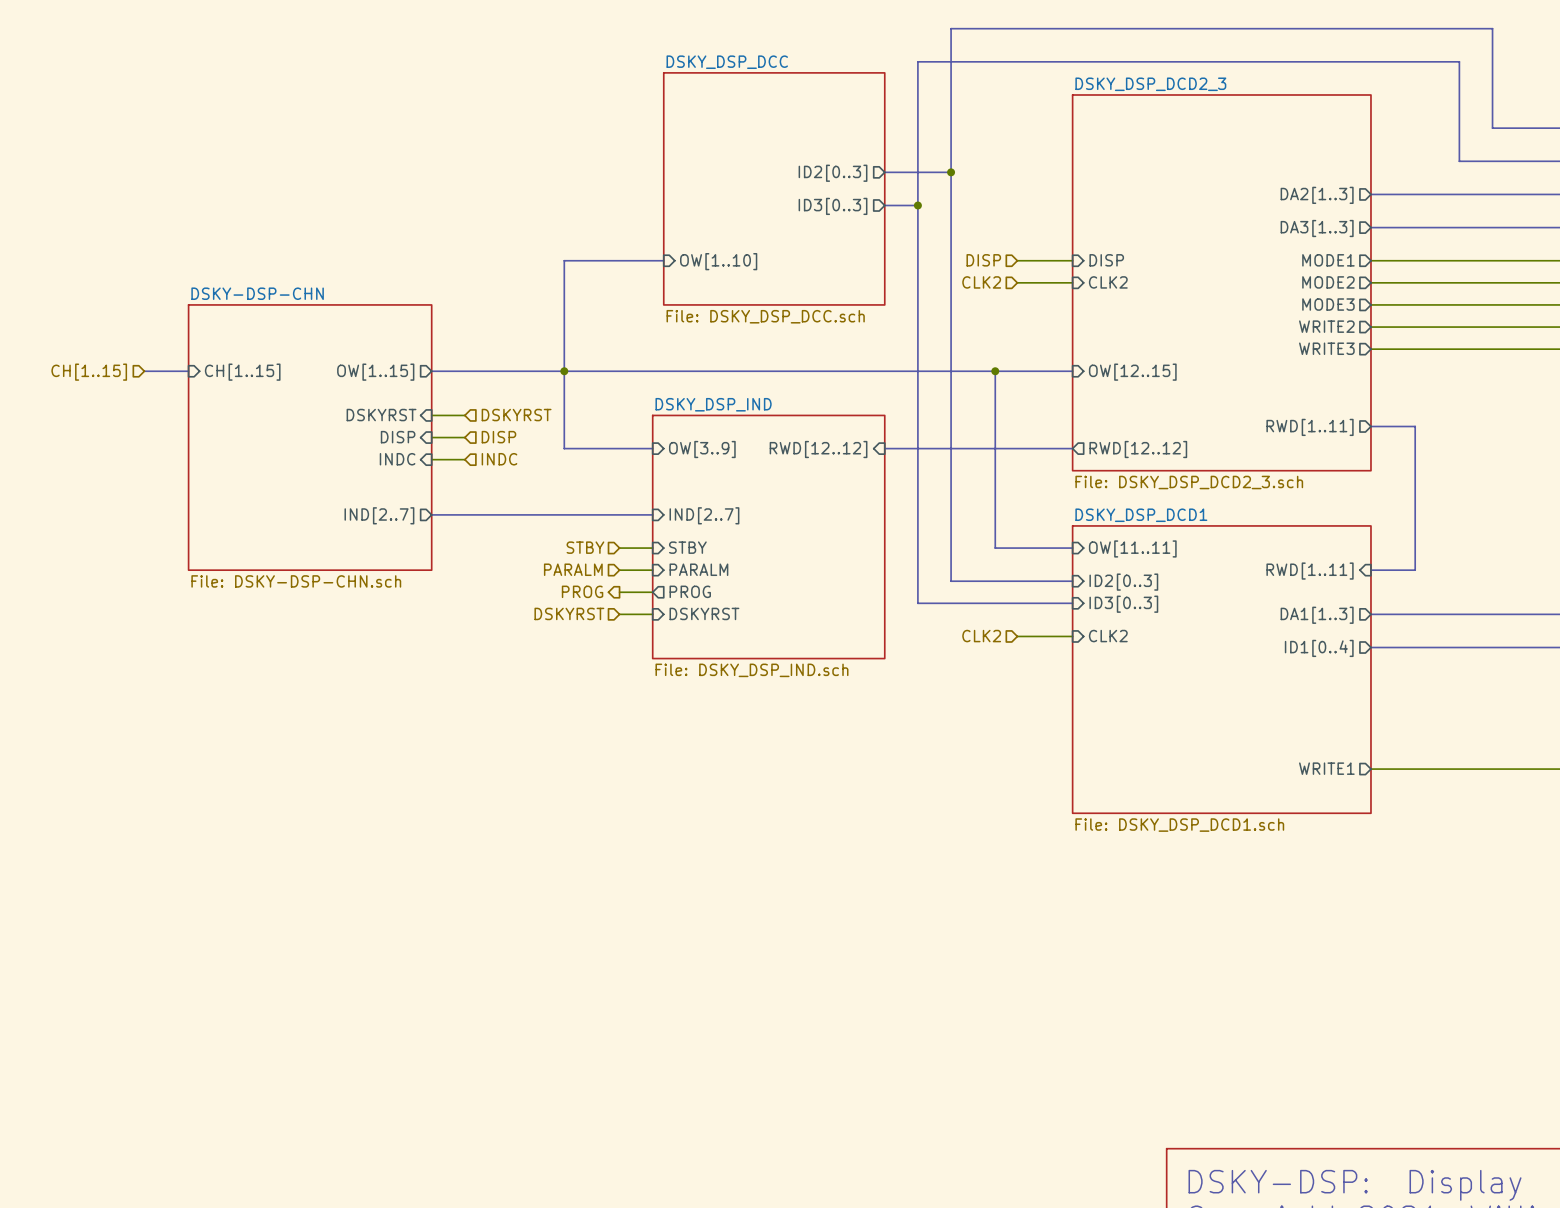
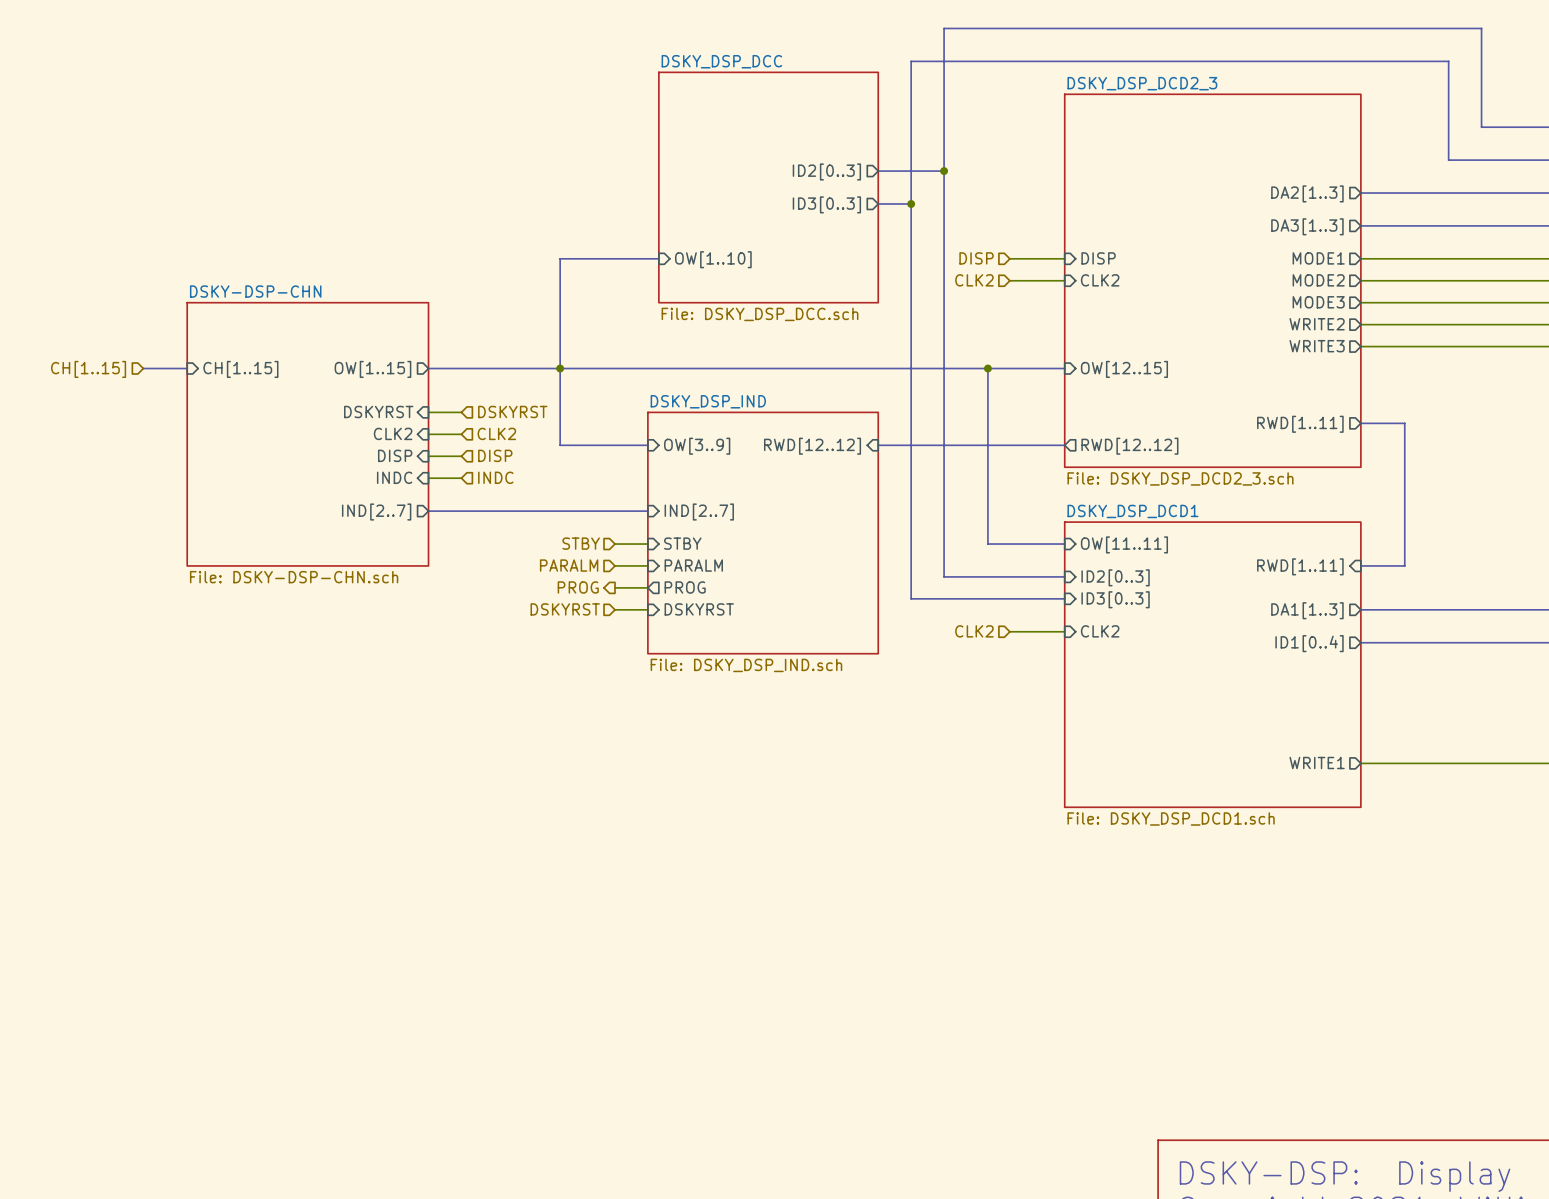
sheet pin: DISP (398, 437) -> CLK2 (393, 433)
hierarchical label: DISP (498, 437) -> CLK2 (496, 433)
sheet pin: INDC (397, 459) -> DISP (395, 455)
hierarchical label: INDC (499, 459) -> DISP (495, 455)
sheet pin: none -> INDC (394, 477)
wire: none -> (428, 478) (461, 478)
hierarchical label: none -> INDC (495, 477)

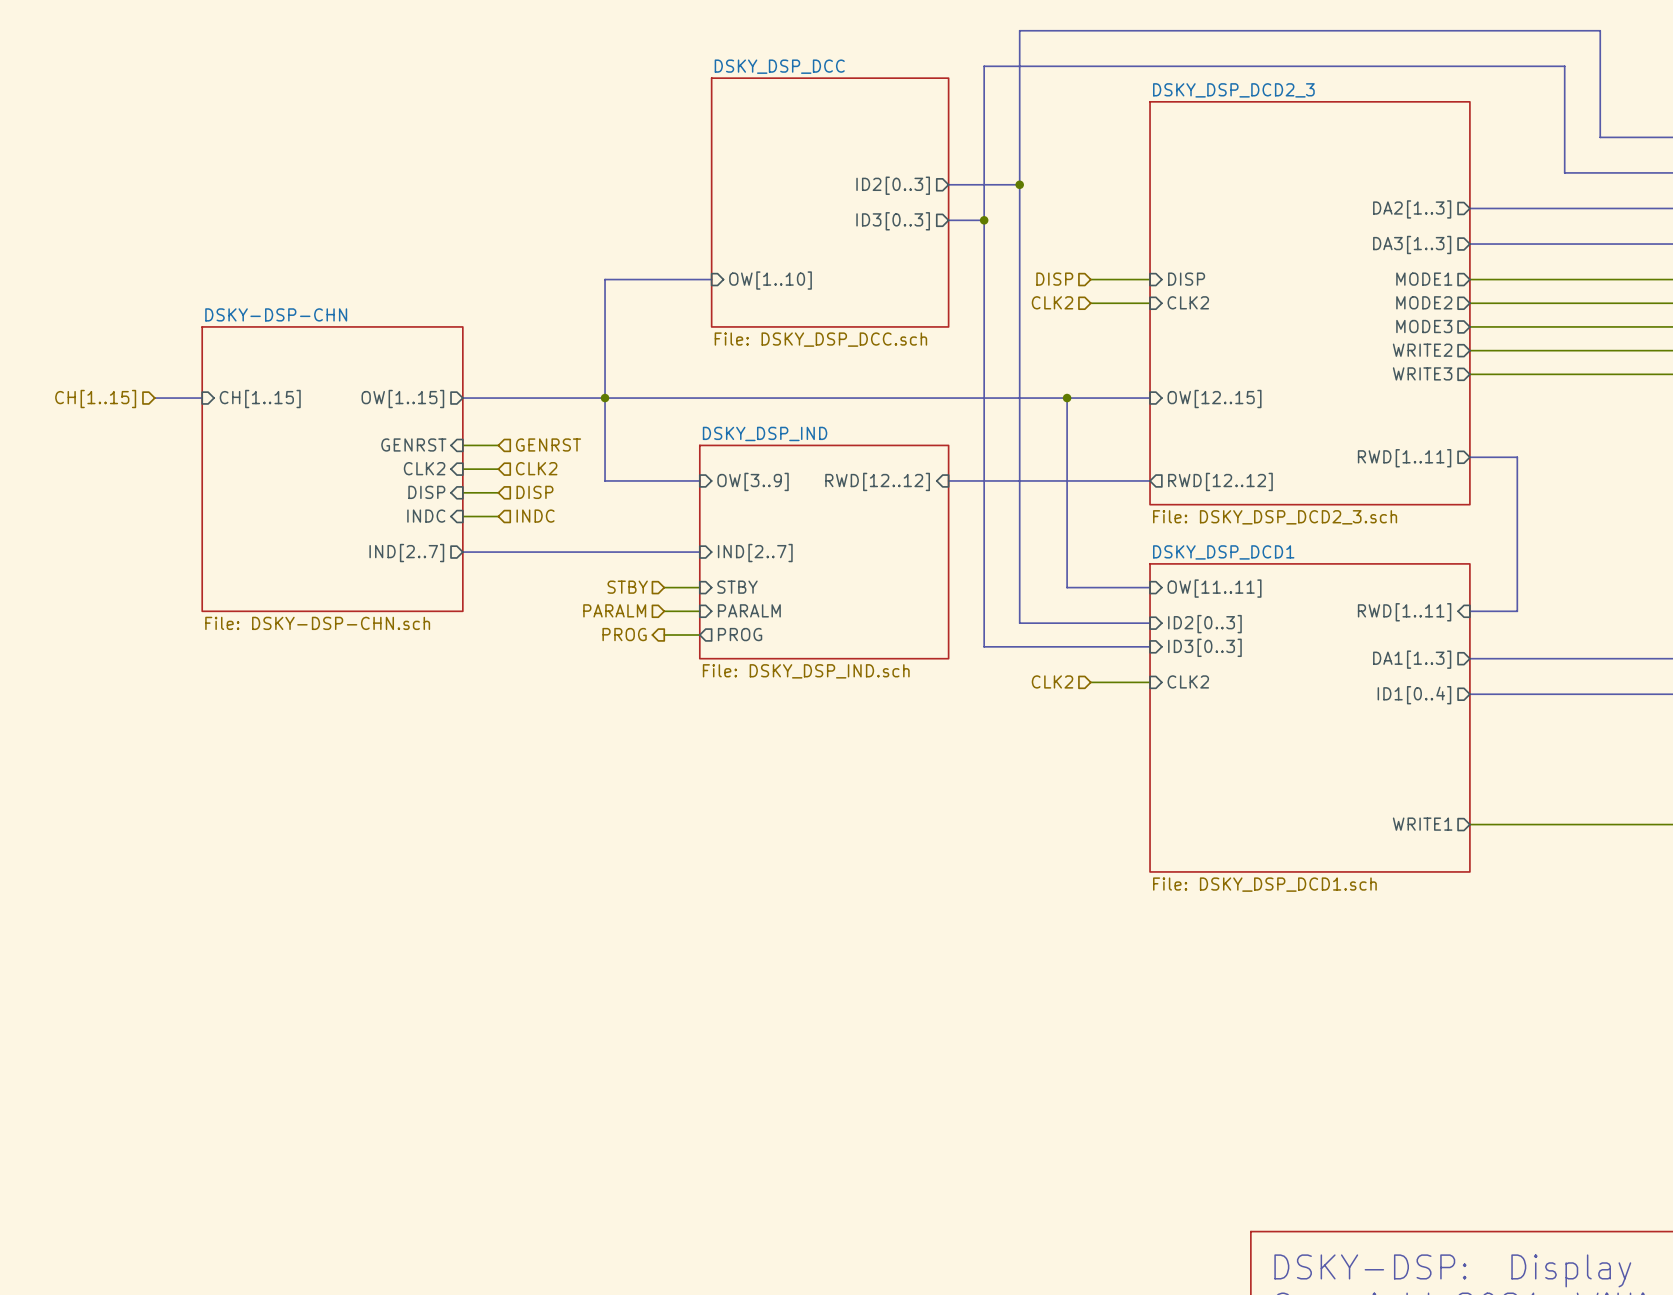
sheet pin: DSKYRST (378, 411) -> GENRST (413, 444)
hierarchical label: DSKYRST (512, 411) -> GENRST (548, 444)
sheet DSKY_DSP_IND: none -> File: DSKY_DSP_IND.sch (824, 552)
sheet DSKY_DSP_IND: File: DSKY_DSP_IND.sch (763, 533) -> none
hierarchical label: DSKYRST (565, 609) -> none
wire: (614, 609) (647, 609) -> none
sheet pin: DSKYRST (699, 609) -> none

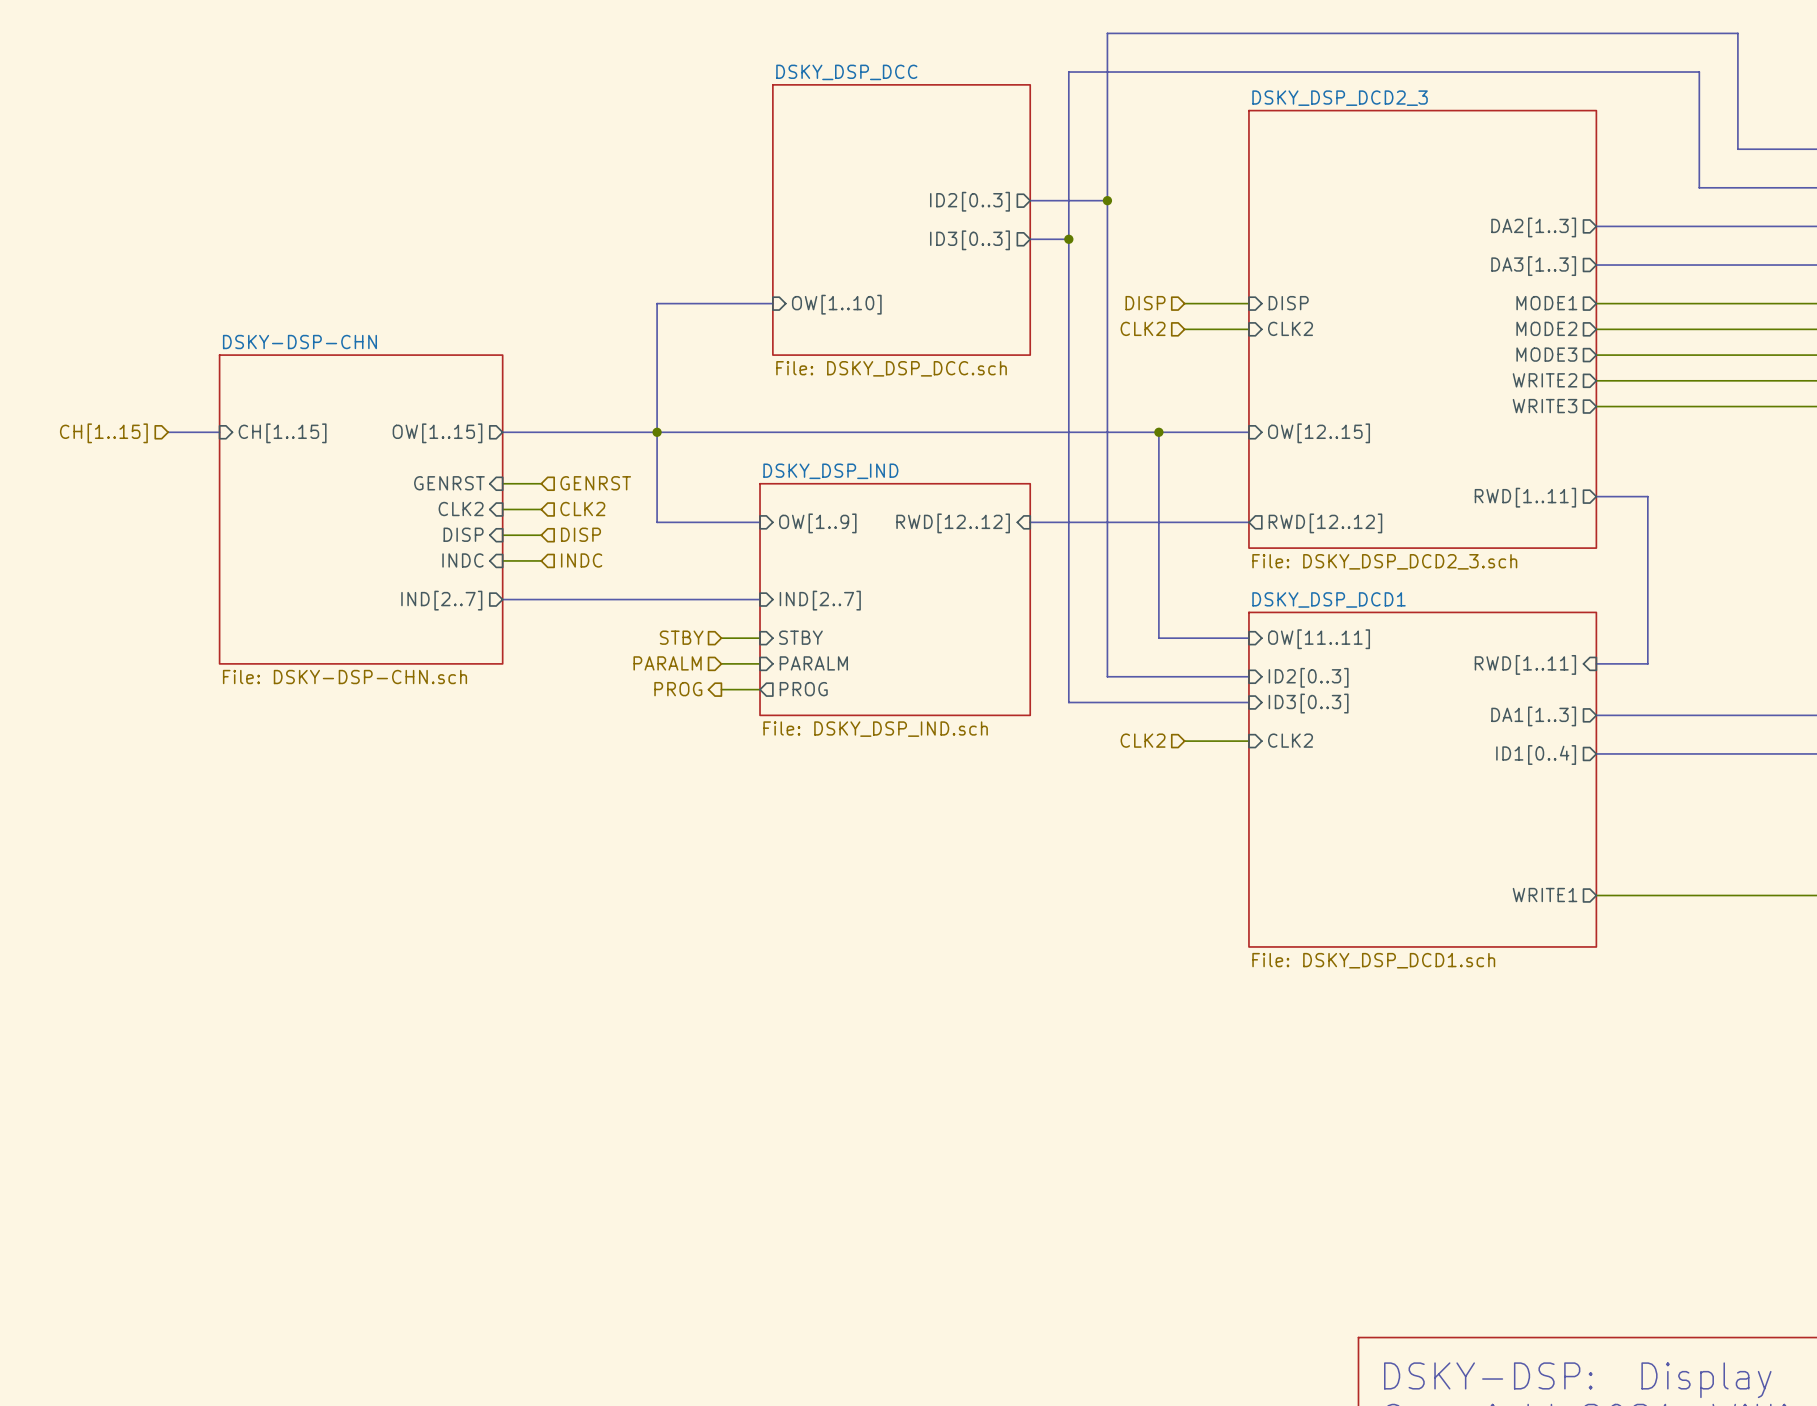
sheet pin: OW[3..9] (753, 481) -> OW[1..9] (817, 523)

